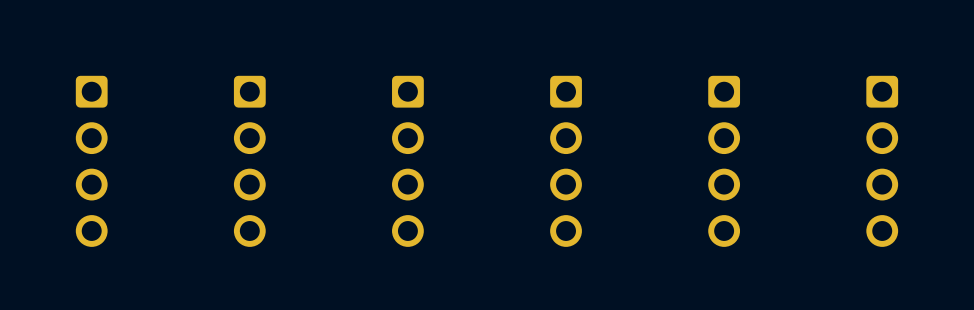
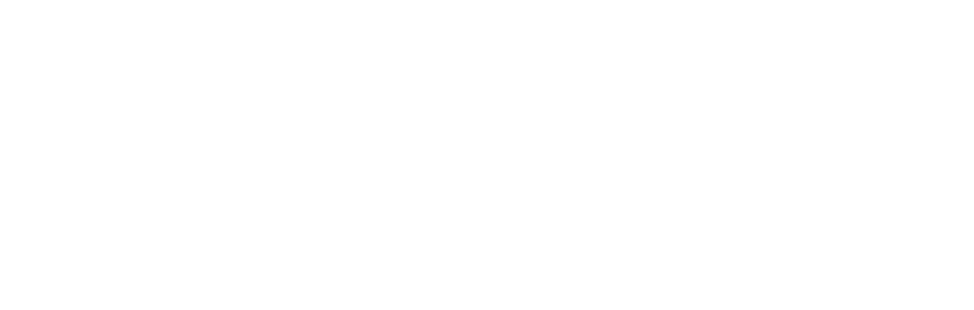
part: (91, 161) -> none
part: (249, 161) -> none
part: (407, 161) -> none
part: (566, 161) -> none
part: (724, 161) -> none
part: (882, 161) -> none

